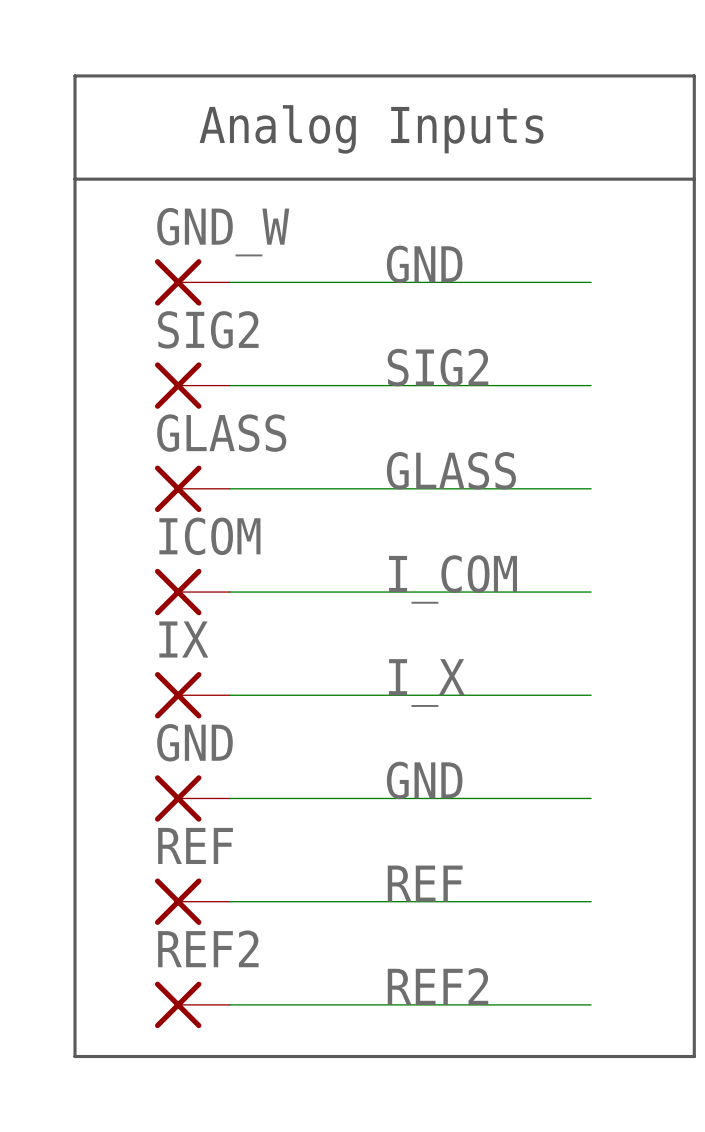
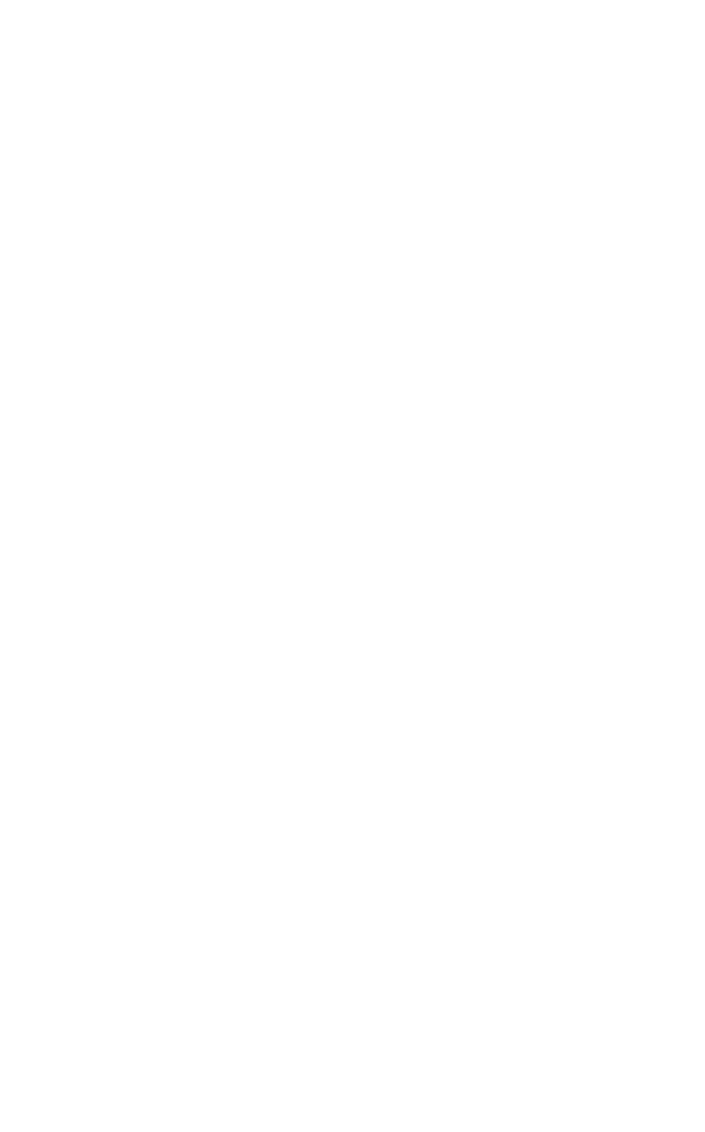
line: (75, 75) (75, 1056) (694, 1056) (694, 75) (75, 75) -> none
text: Analog Inputs (371, 129) -> none
line: (75, 179) (694, 179) -> none
label: GND (424, 264) -> none
GND_W: (192, 282) -> none
wire: (229, 282) (591, 282) -> none
label: SIG2 (437, 367) -> none
SIG2: (192, 385) -> none
wire: (229, 385) (591, 385) -> none
label: GLASS (451, 470) -> none
GLASS: (192, 488) -> none
wire: (229, 488) (591, 488) -> none
label: I_COM (453, 579) -> none
ICOM: (192, 592) -> none
wire: (229, 592) (591, 592) -> none
label: I_X (426, 683) -> none
IX: (192, 695) -> none
wire: (229, 695) (591, 695) -> none
label: GND (424, 780) -> none
GND: (192, 798) -> none
wire: (229, 798) (591, 798) -> none
label: REF (425, 883) -> none
REF: (192, 901) -> none
wire: (229, 901) (591, 901) -> none
label: REF2 (438, 986) -> none
REF2: (192, 1004) -> none
wire: (229, 1004) (591, 1004) -> none

